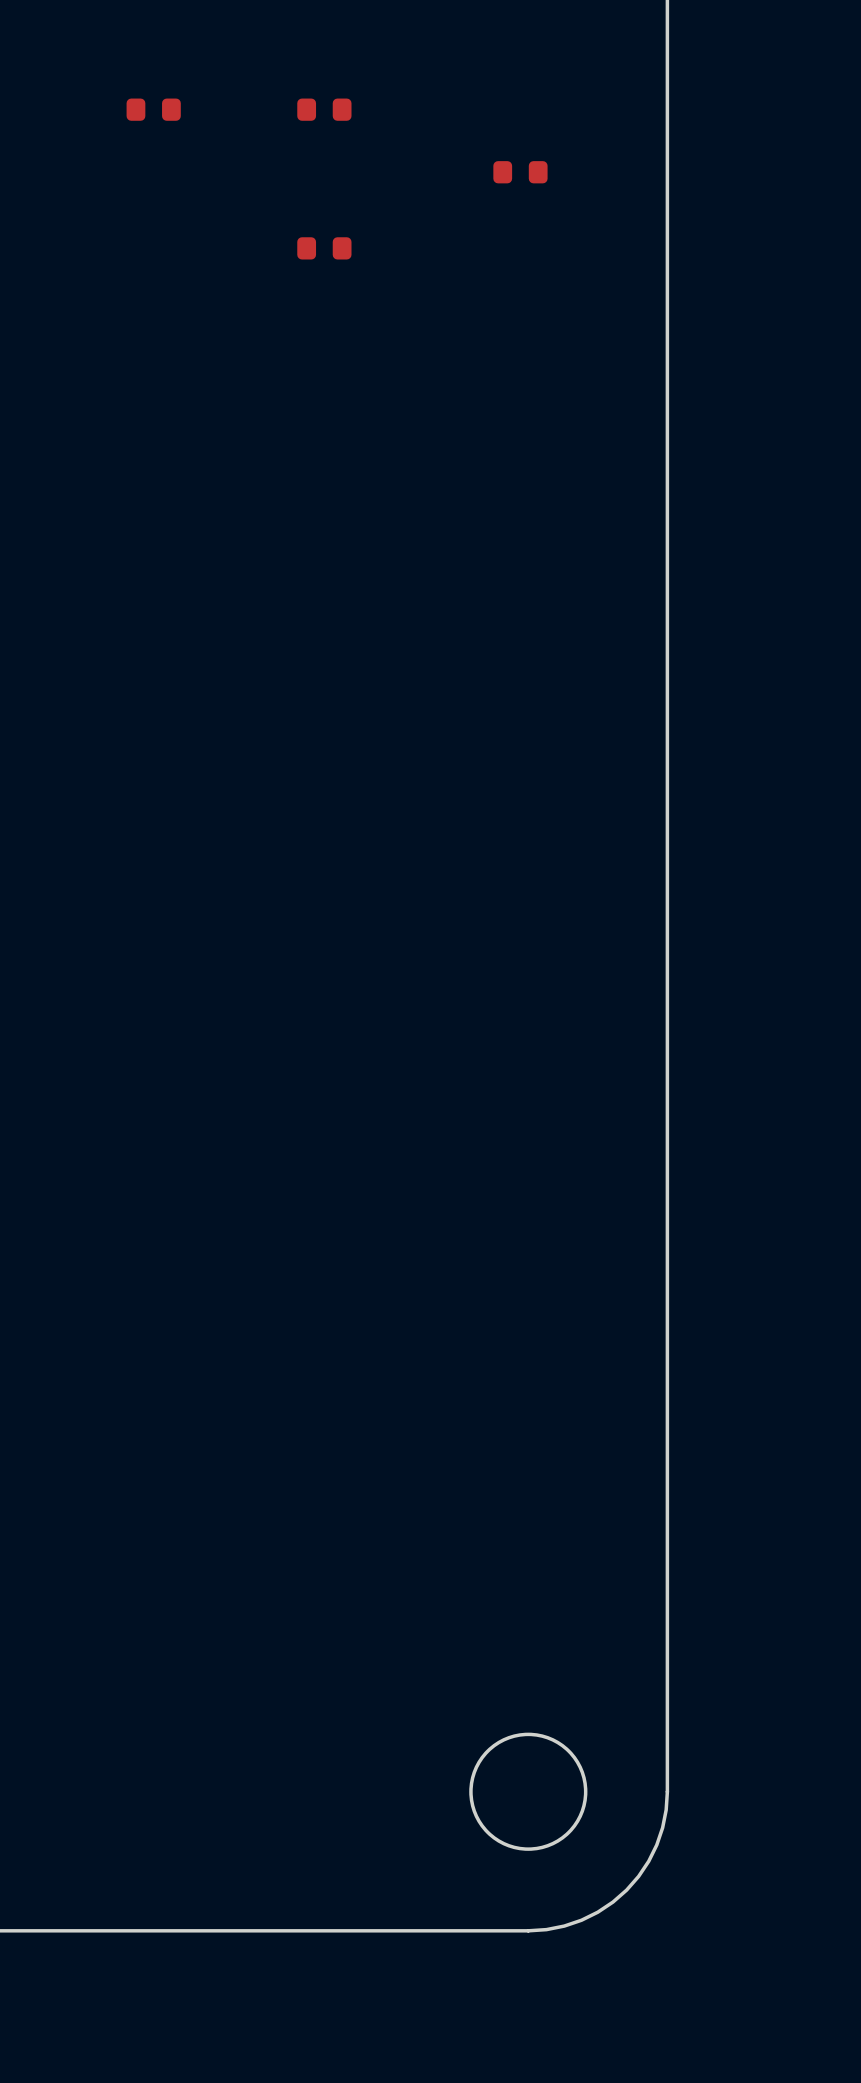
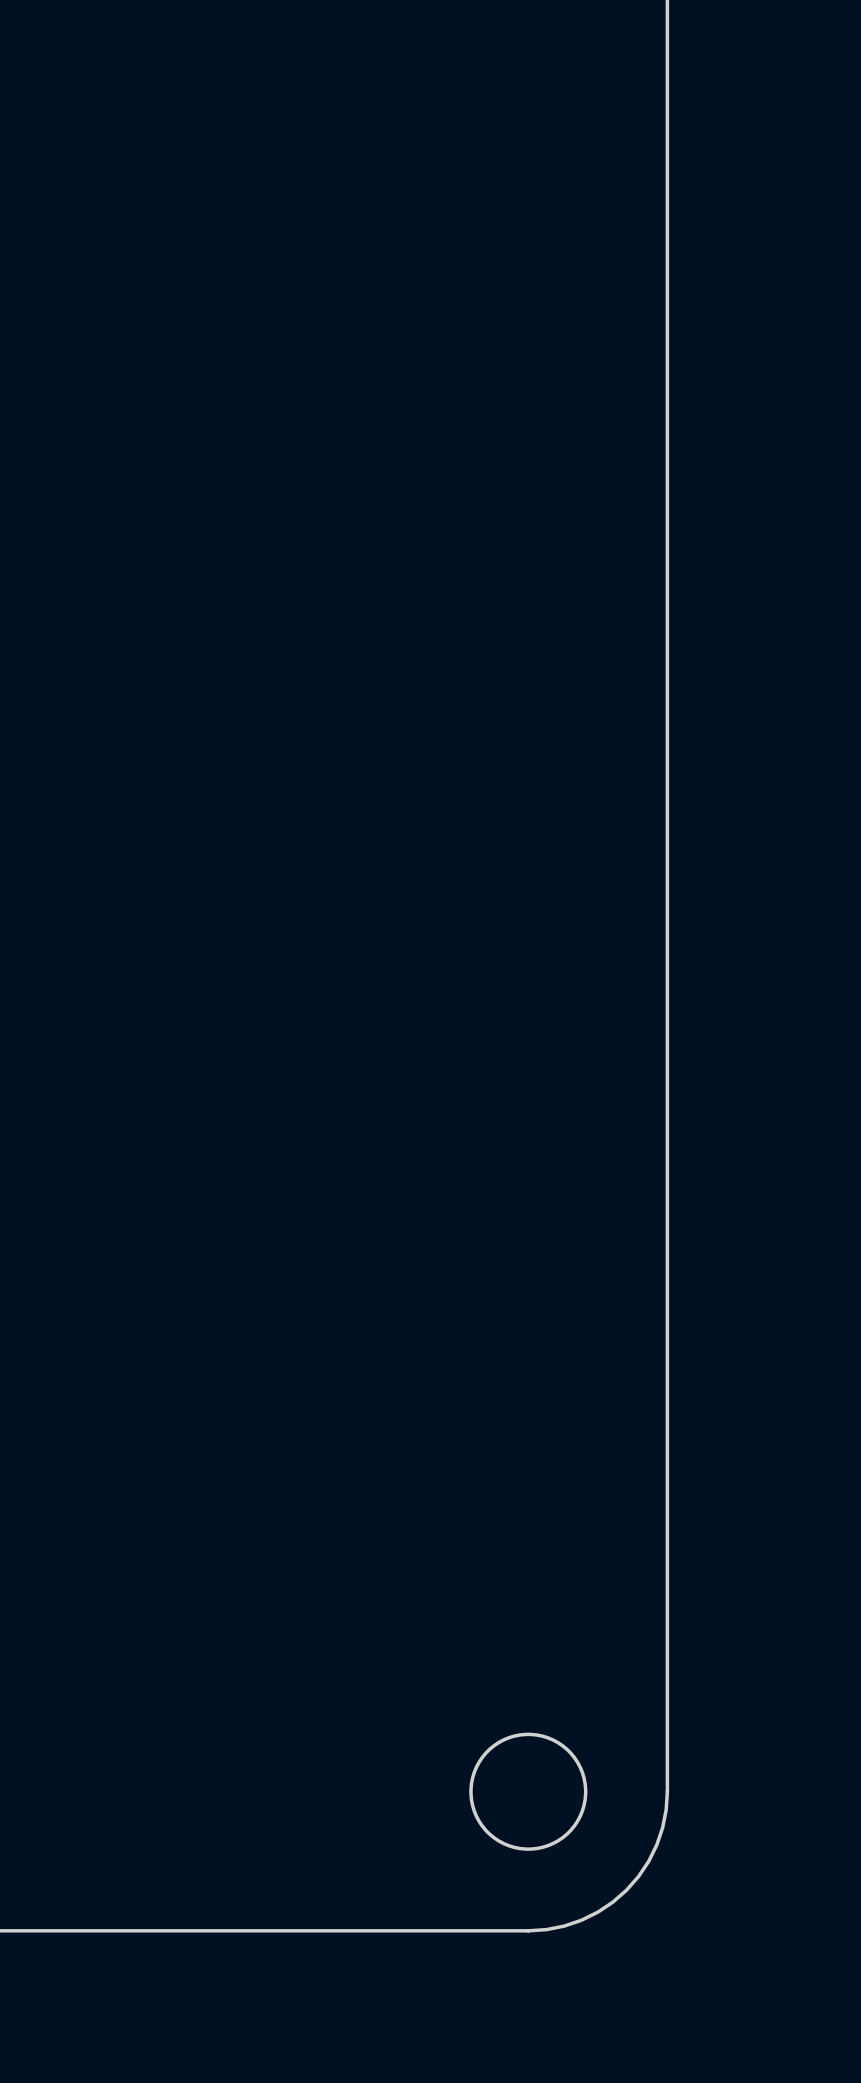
part: (153, 109) -> none
part: (324, 109) -> none
part: (520, 172) -> none
part: (324, 248) -> none

